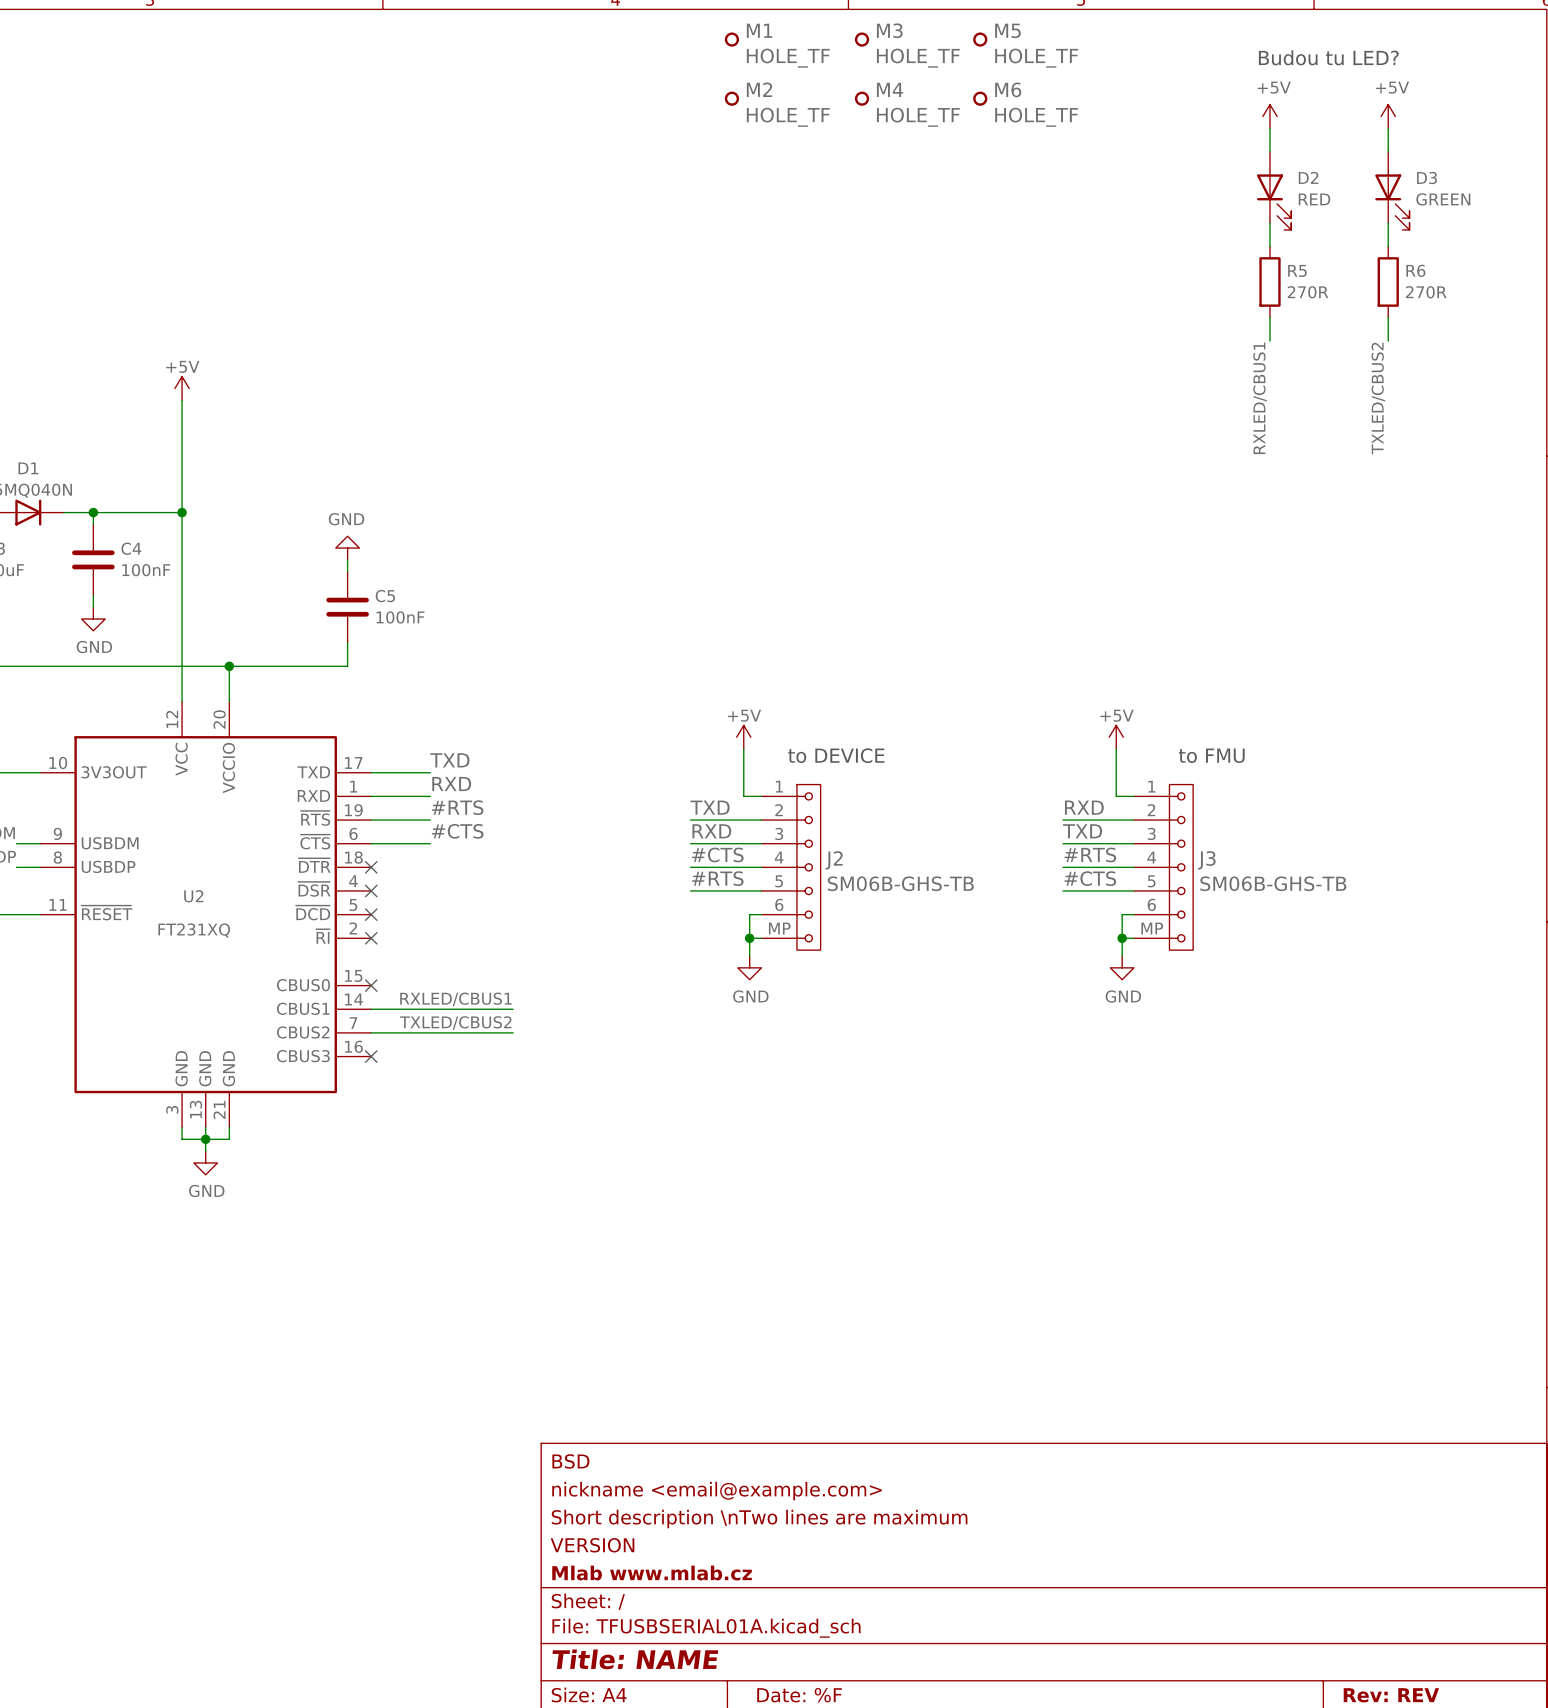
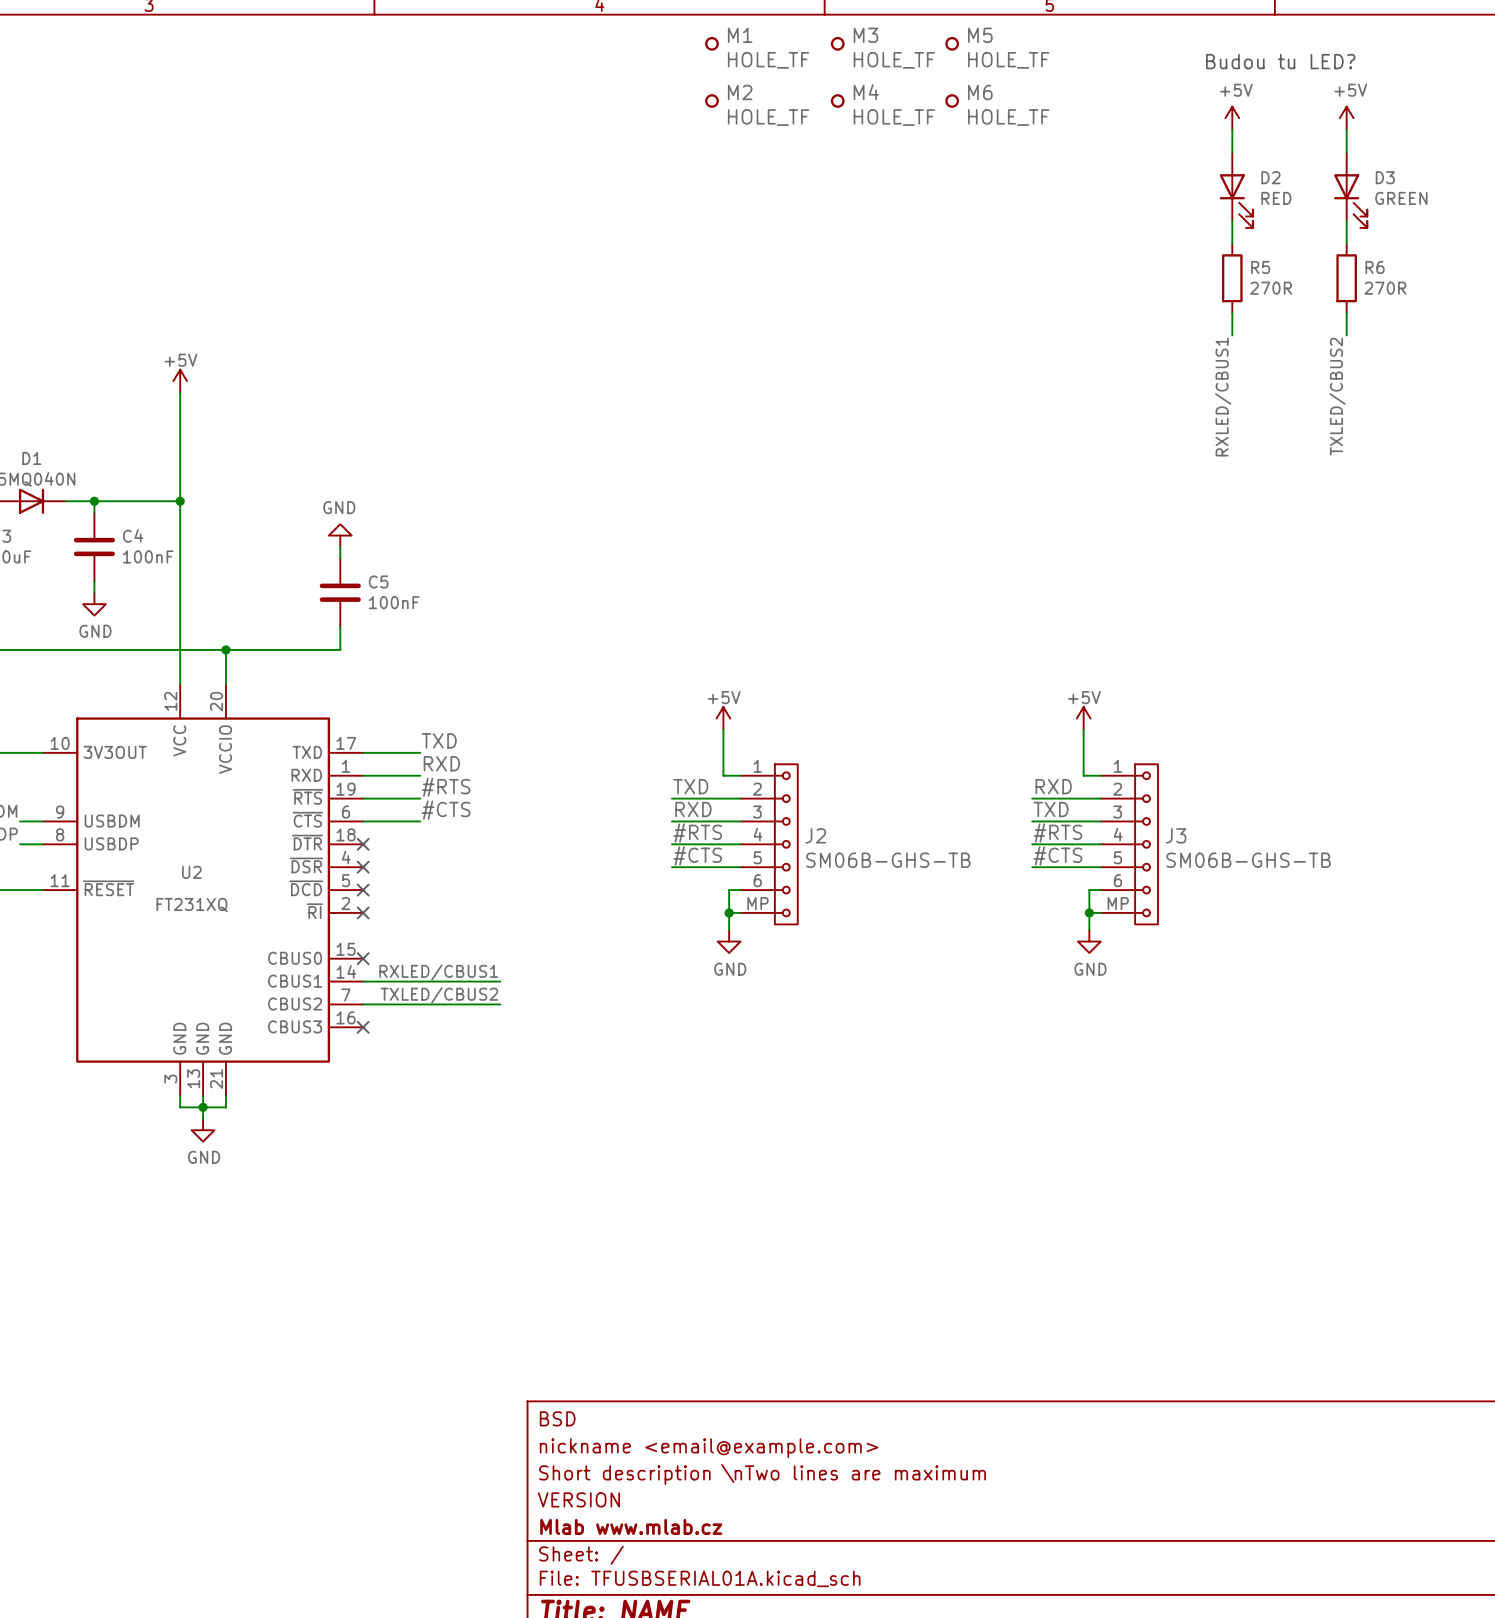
text: to DEVICE (836, 755) -> none
text: to FMU (1211, 755) -> none
label: #CTS (717, 854) -> #RTS (697, 833)
label: #RTS (717, 878) -> #CTS (697, 855)

